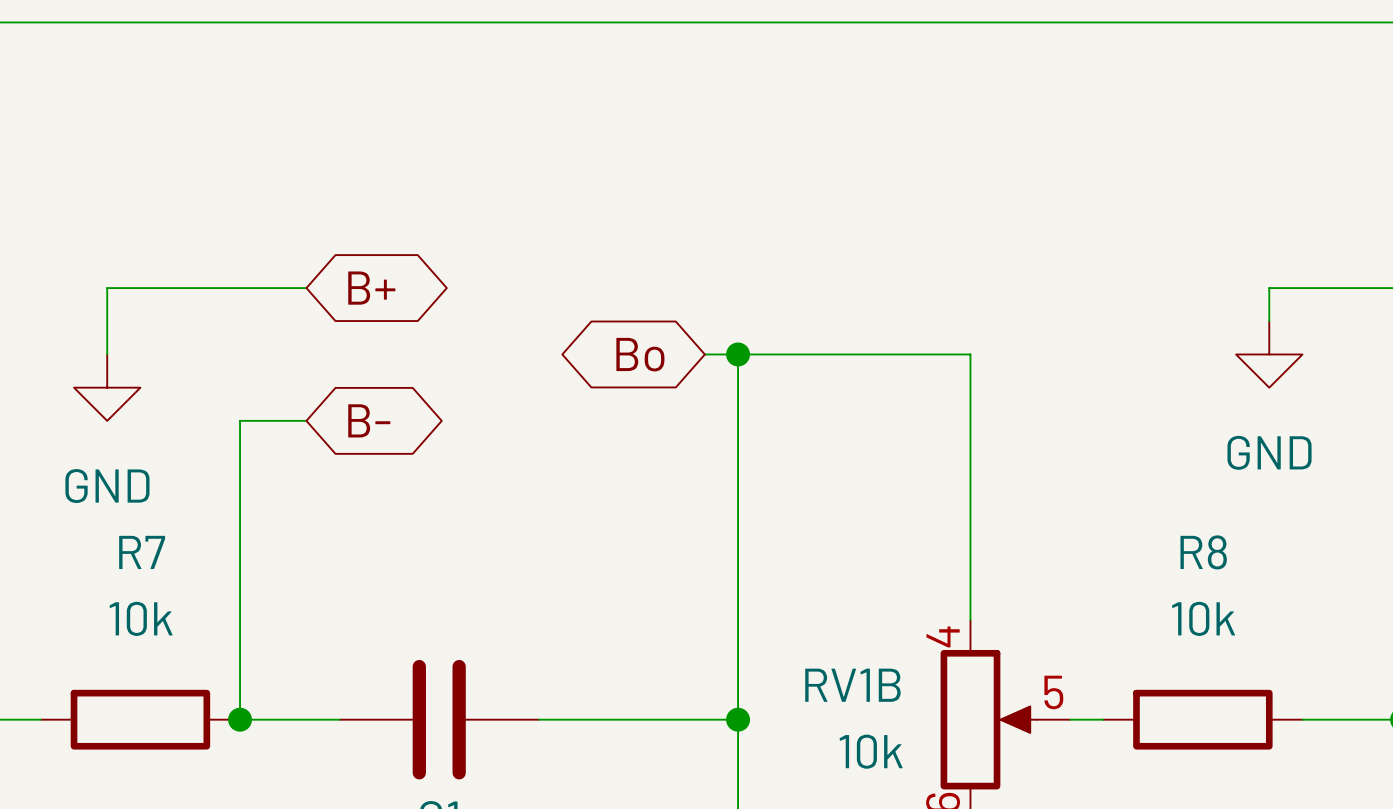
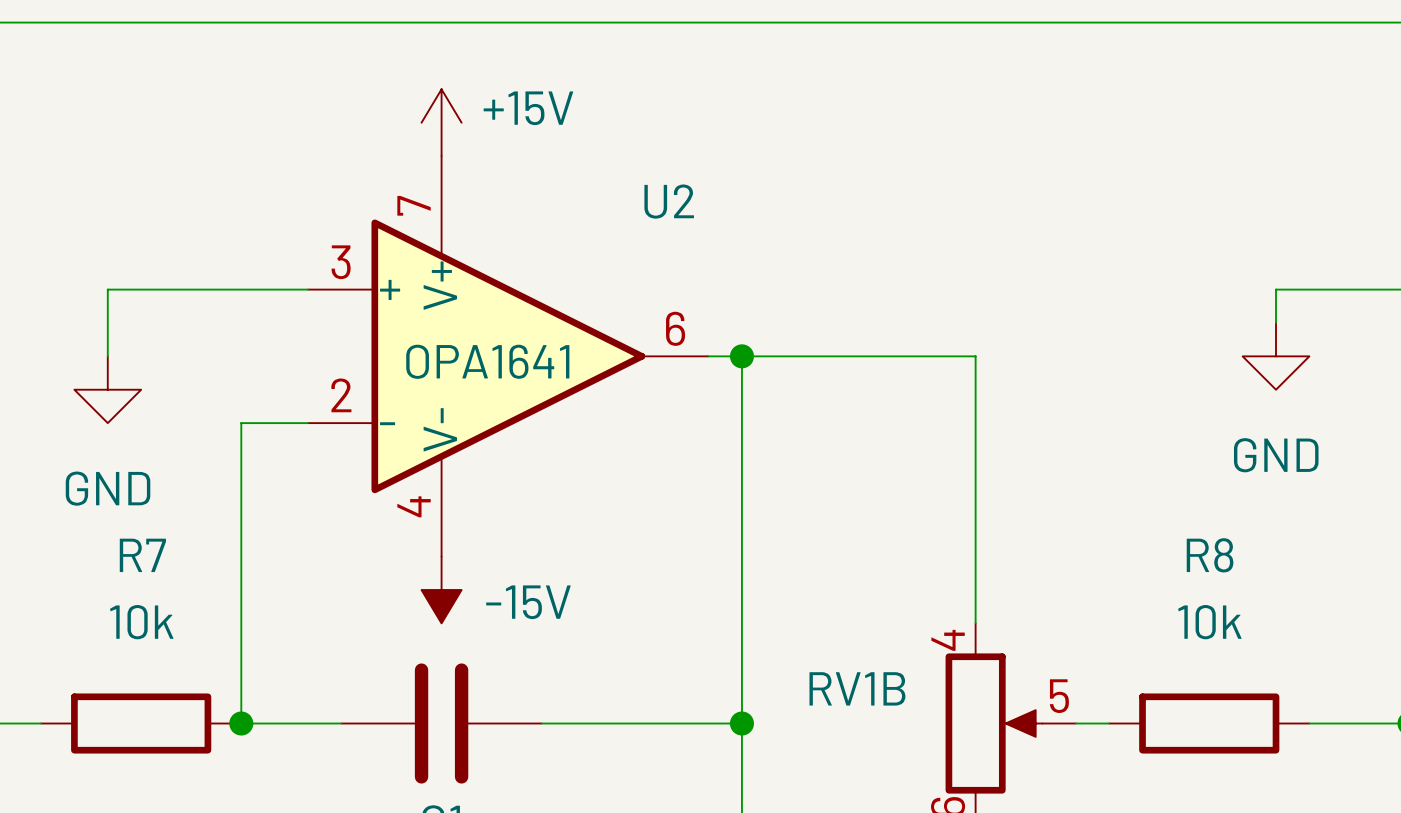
power symbol: none -> +15V (441, 122)
global label: B+ (371, 288) -> none
U2: none -> OPA1641 (508, 356)
global label: Bo (640, 354) -> none
global label: B- (369, 420) -> none
power symbol: none -> -15V (441, 589)
RV1B value: 10k (871, 751) -> none

